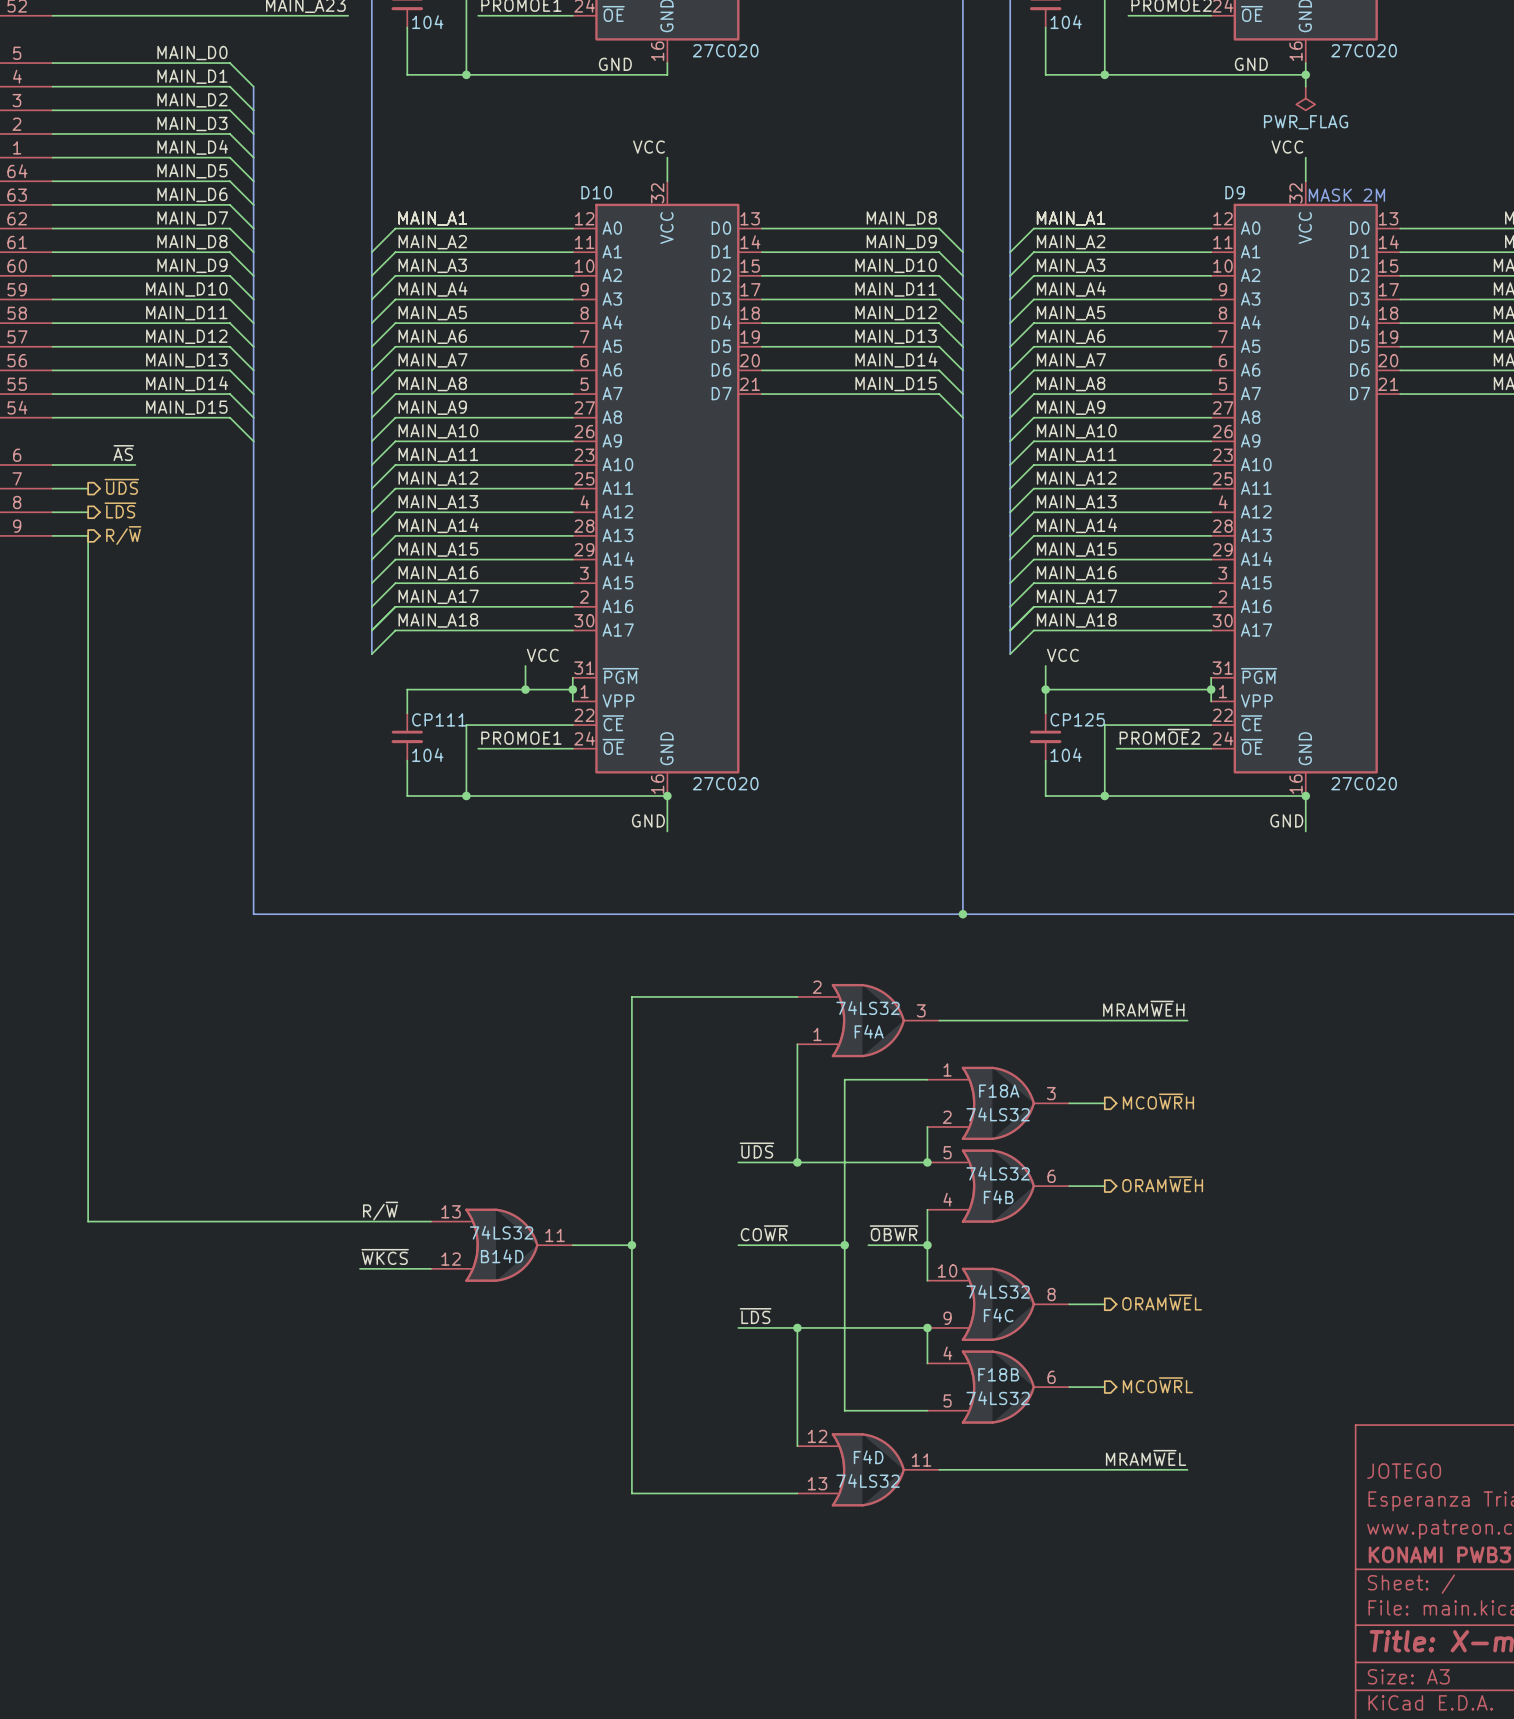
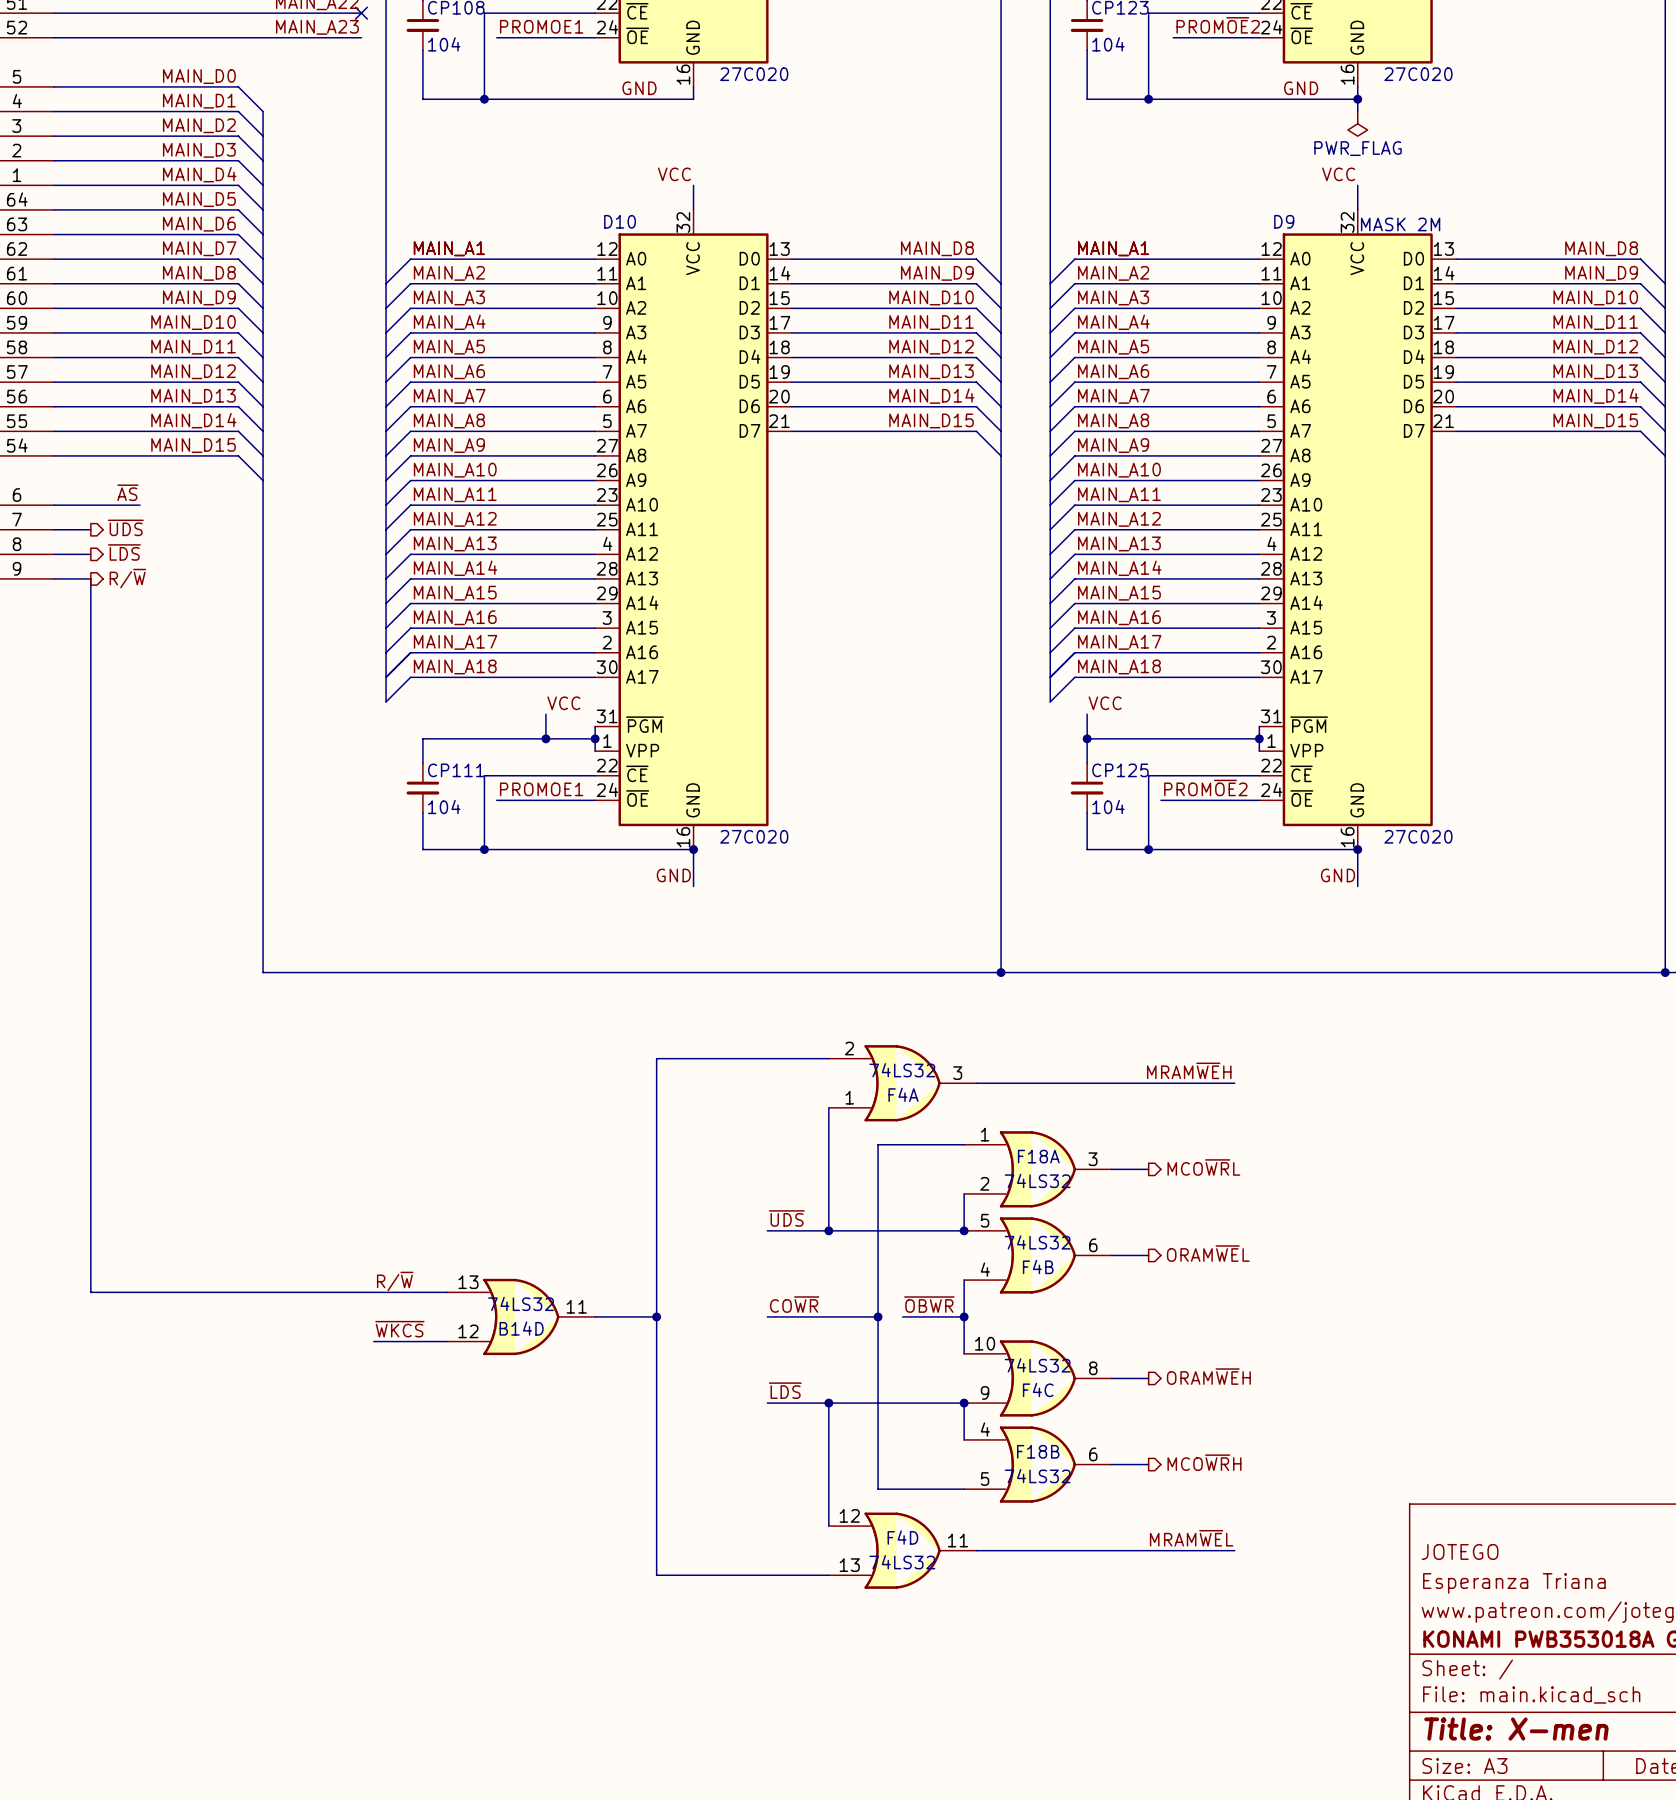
hierarchical label: MCO~{WR}H (1158, 1101) -> MCO~{WR}L (1203, 1167)
hierarchical label: ORAM~{WE}H (1162, 1184) -> ORAM~{WE}L (1208, 1253)
hierarchical label: ORAM~{WE}L (1162, 1302) -> ORAM~{WE}H (1208, 1376)
hierarchical label: MCO~{WR}L (1157, 1385) -> MCO~{WR}H (1204, 1462)

